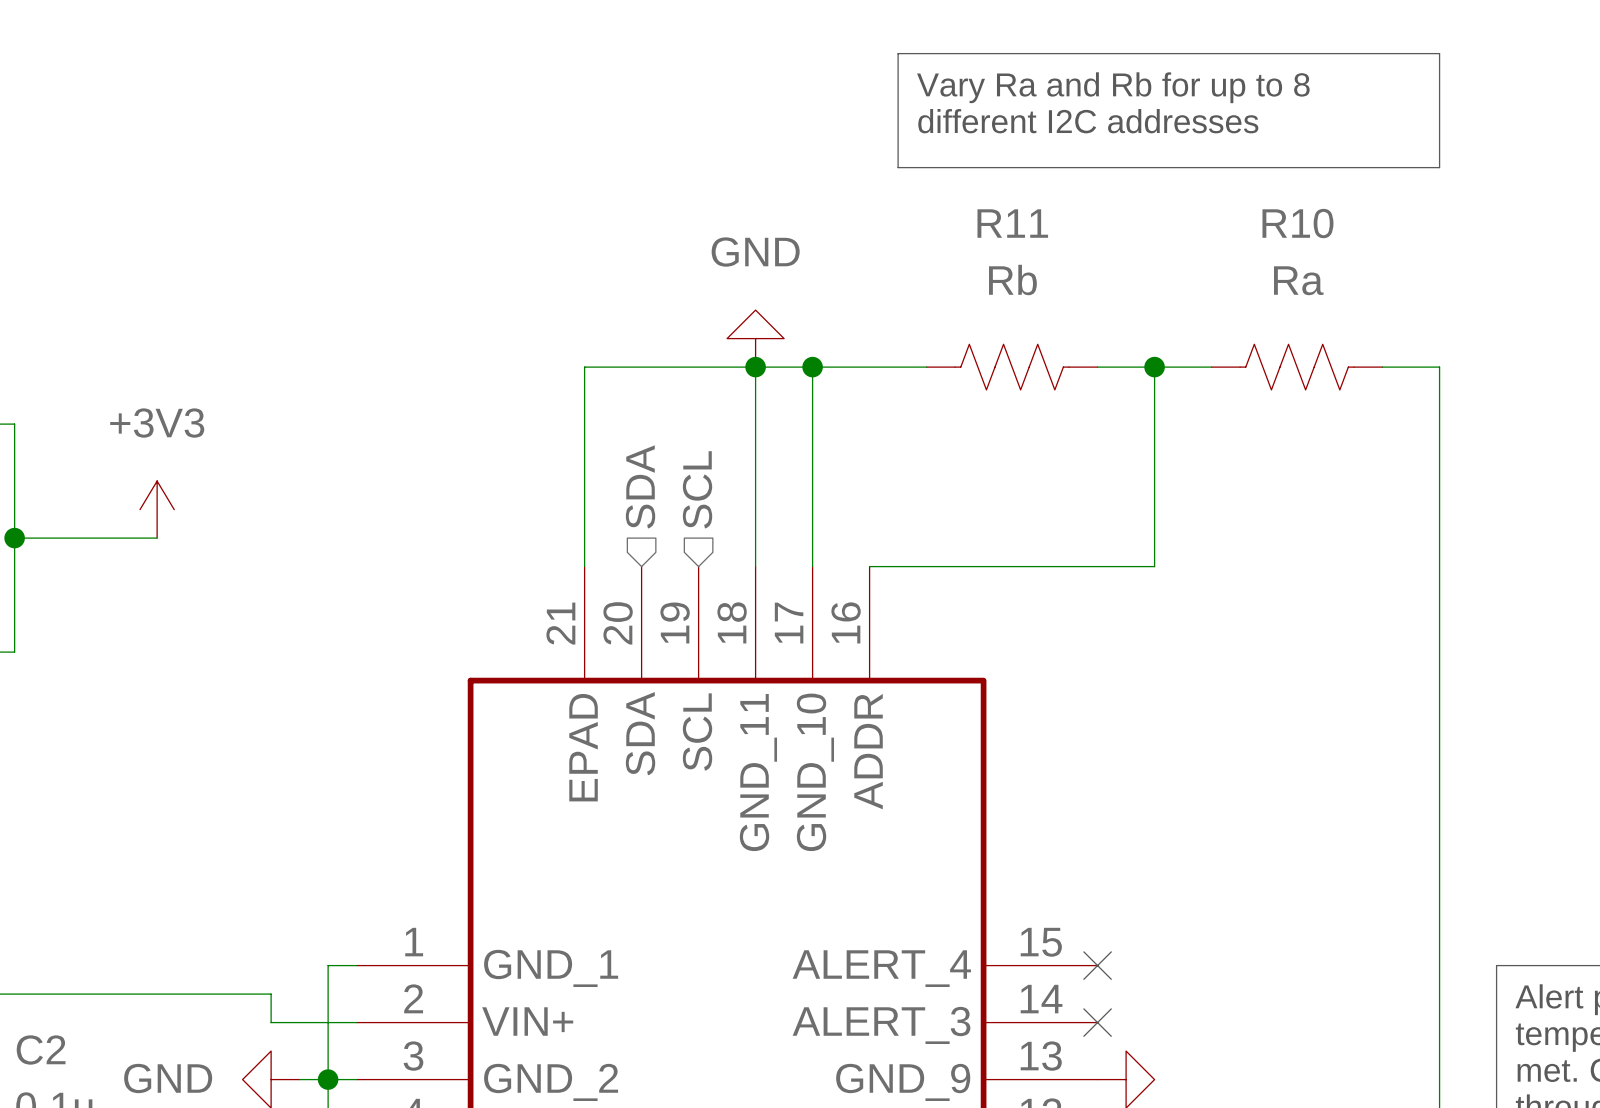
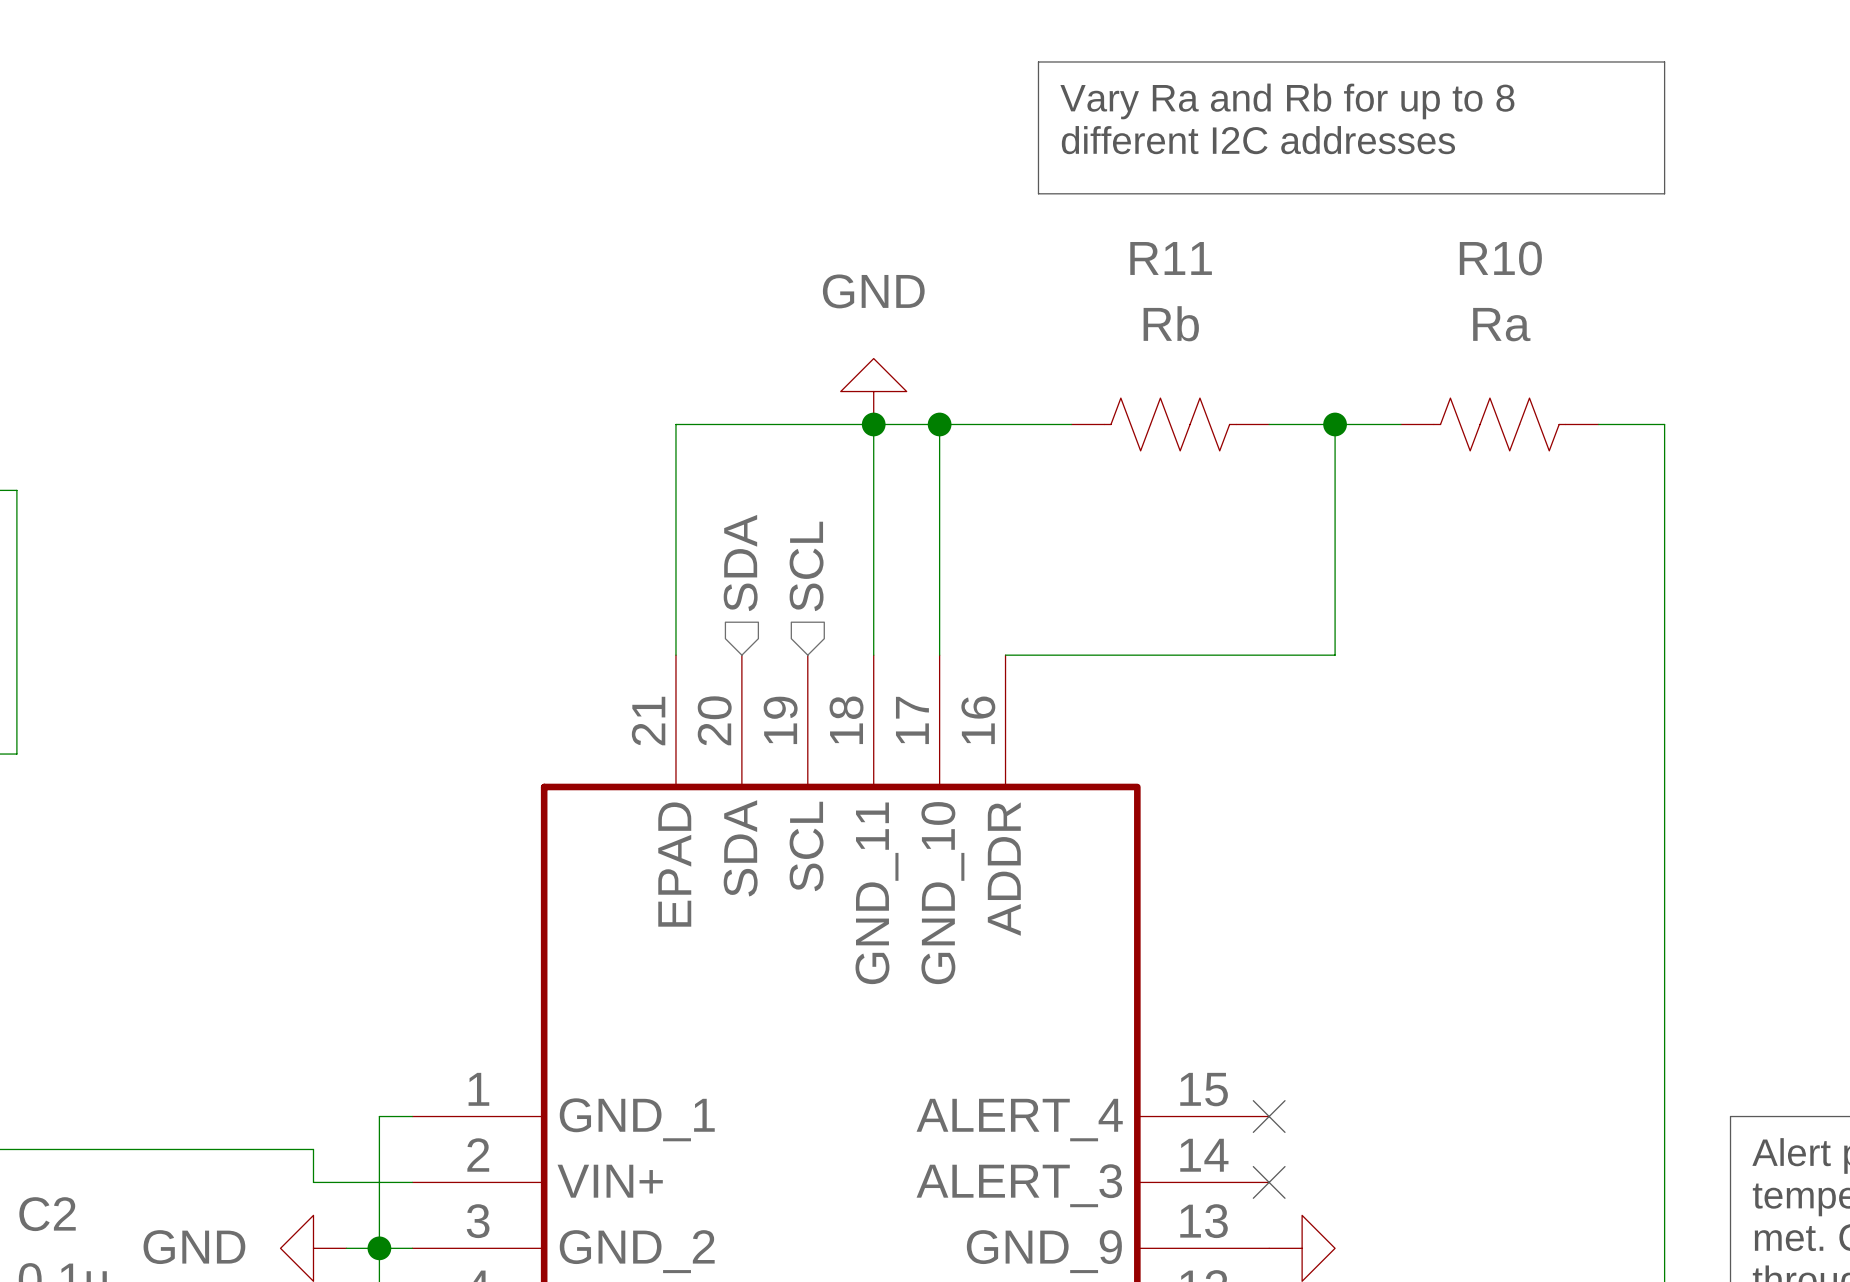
power symbol: +3V3 (157, 509) -> none
wire: (14, 538) (157, 538) -> none
junction: (14, 538) -> none

